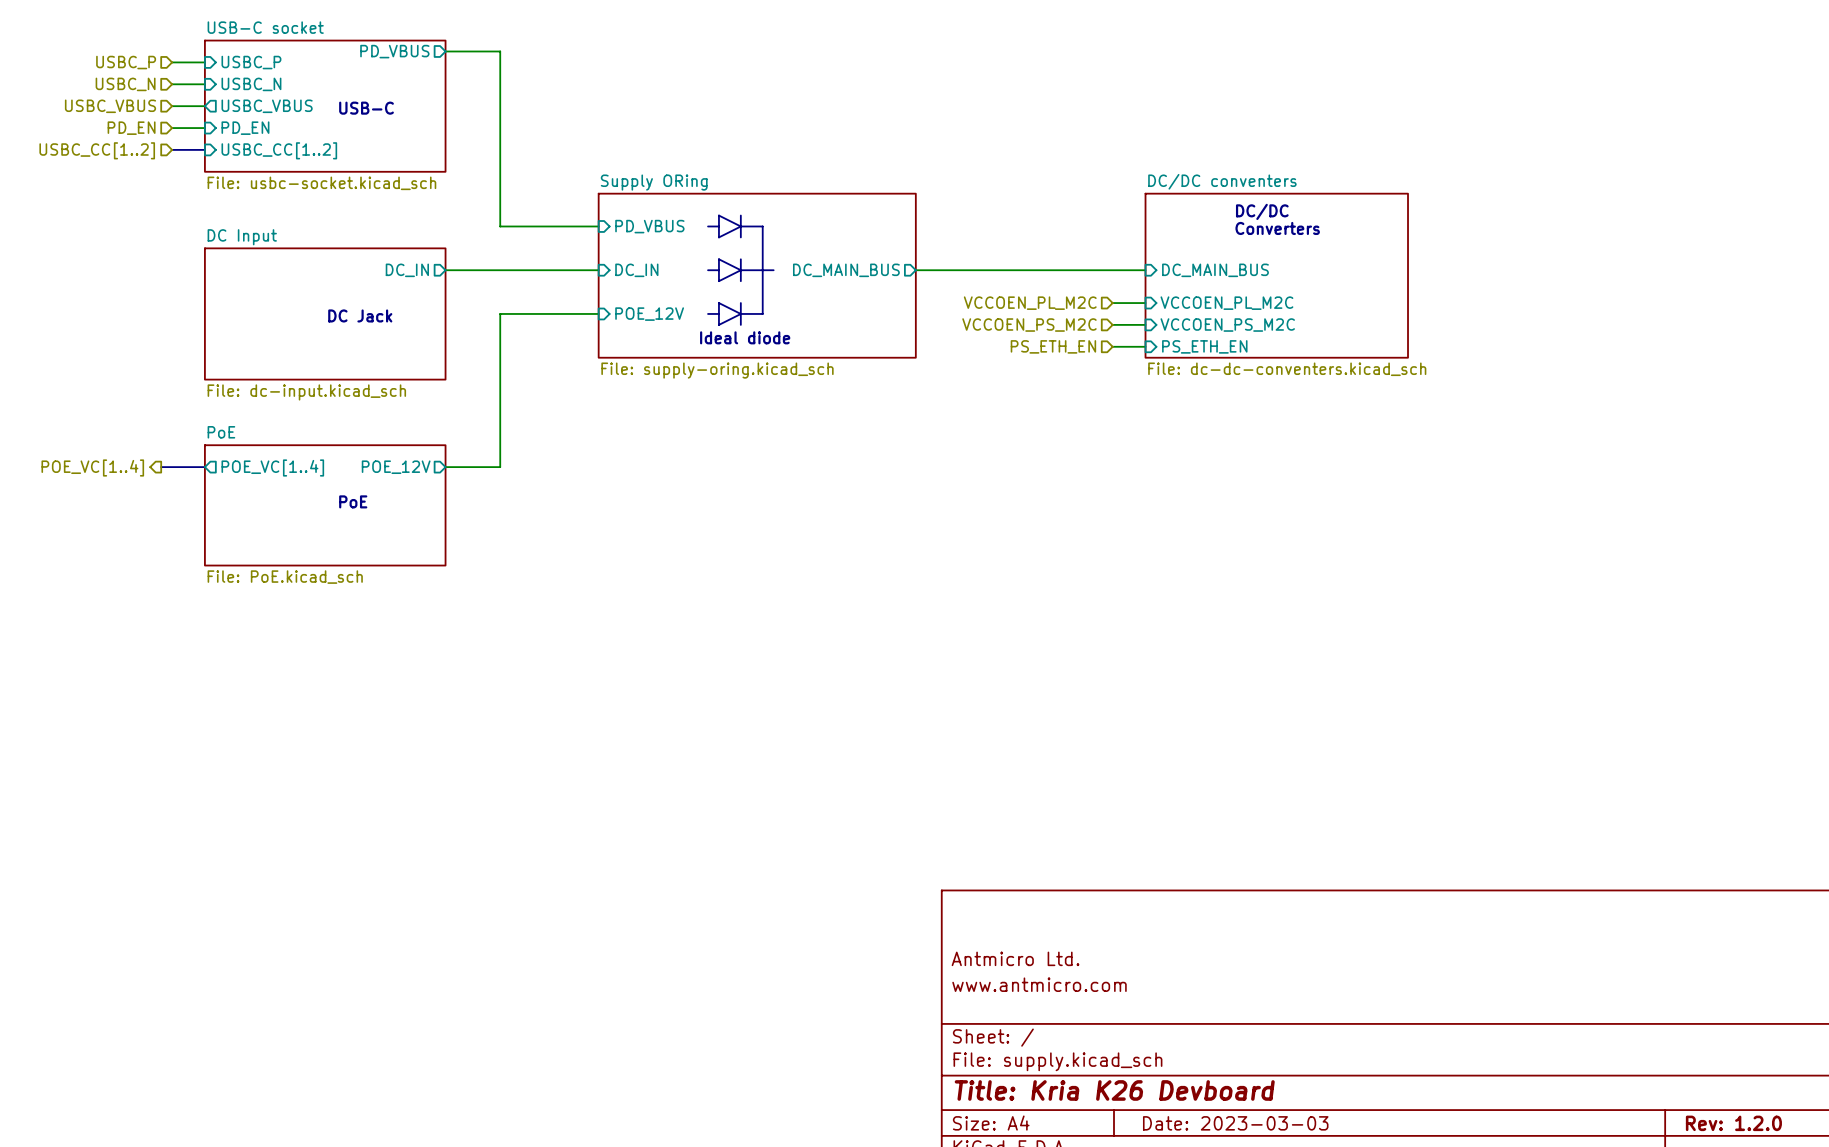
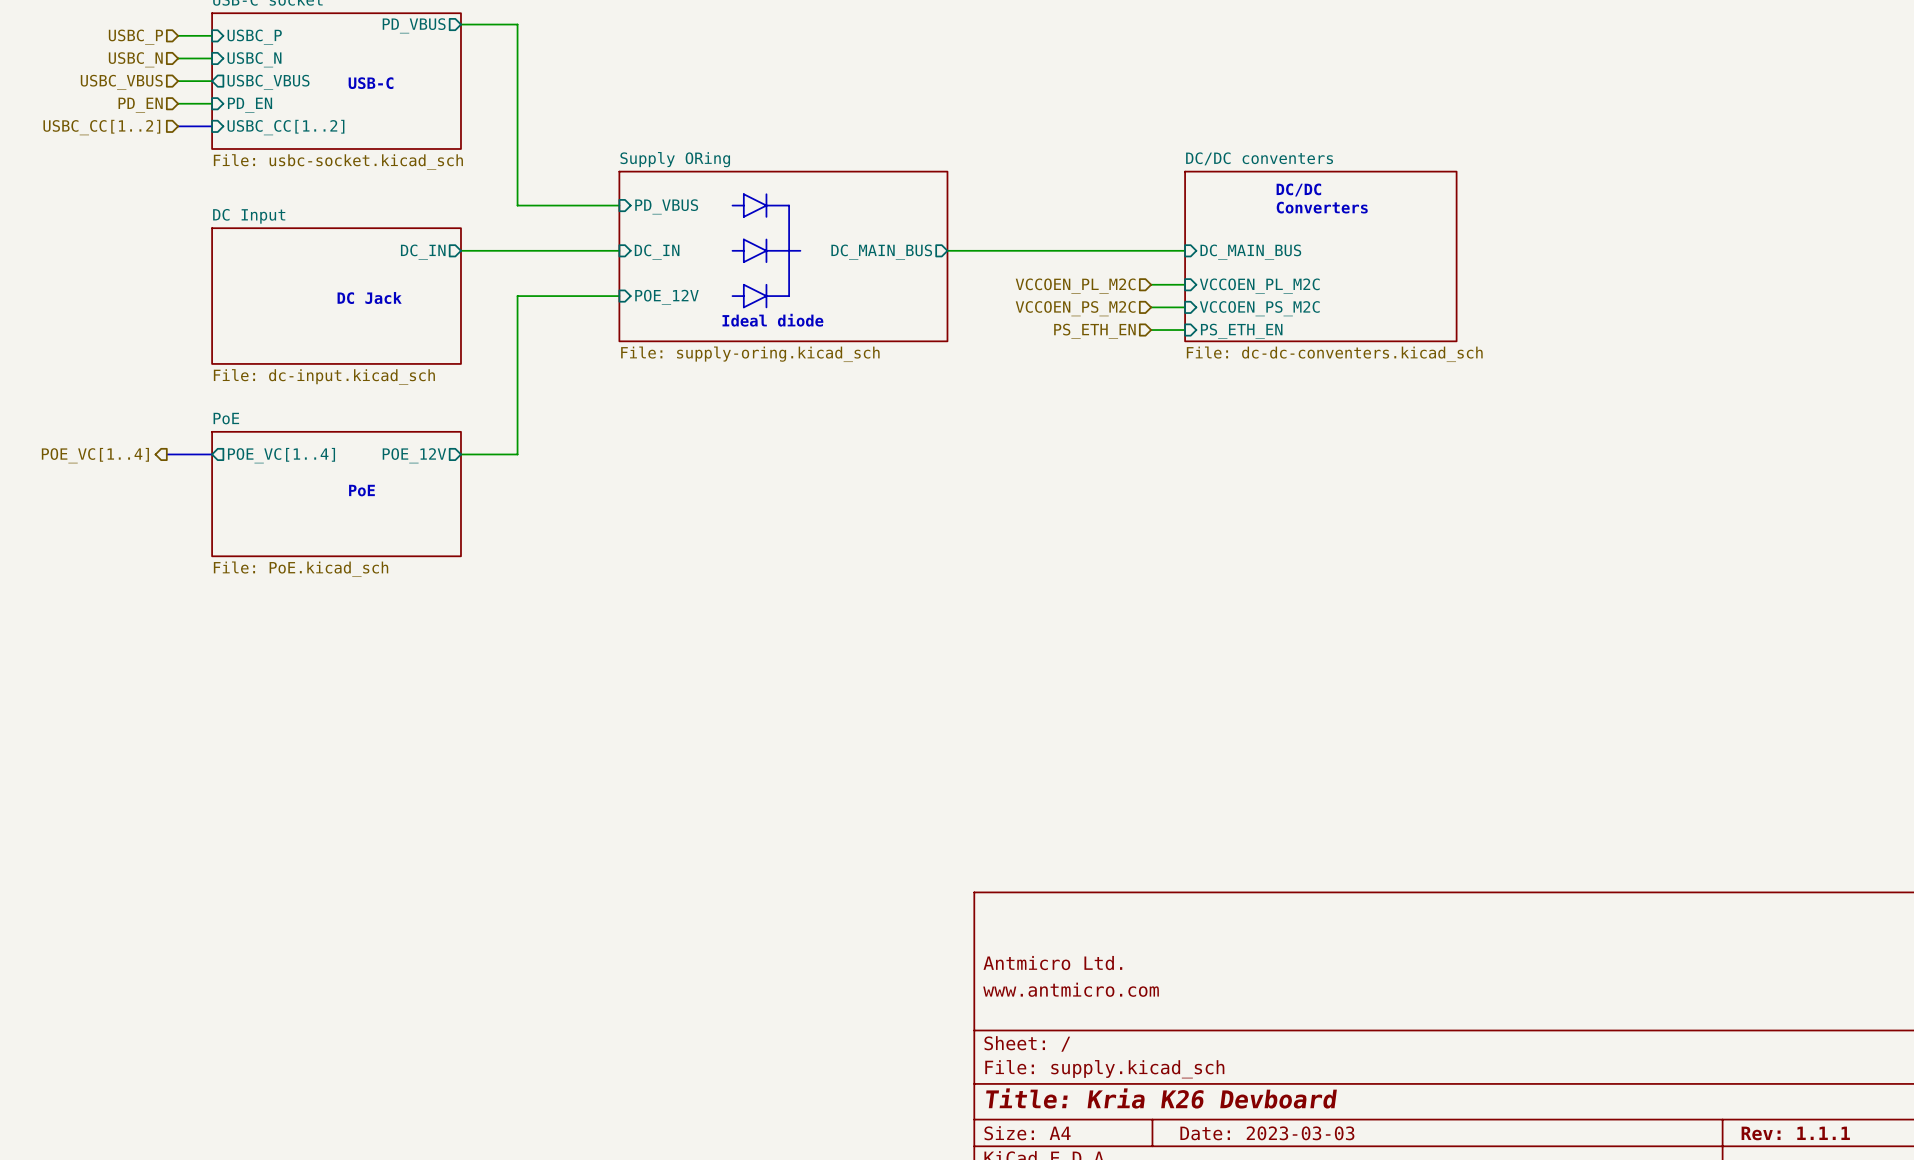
title block: Rev: 1.2.0 (1733, 1123) -> Rev: 1.1.1 (1795, 1133)

